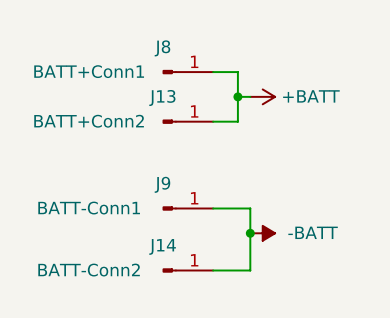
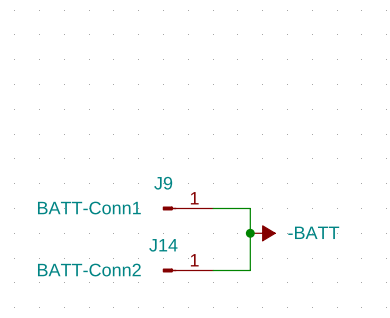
J8: BATT+Conn1 (187, 72) -> none
wire: (213, 72) (237, 72) (237, 121) (213, 121) -> none
wire: (237, 96) (250, 96) -> none
junction: (237, 96) -> none
power symbol: +BATT (262, 96) -> none
J13: BATT+Conn2 (187, 121) -> none

